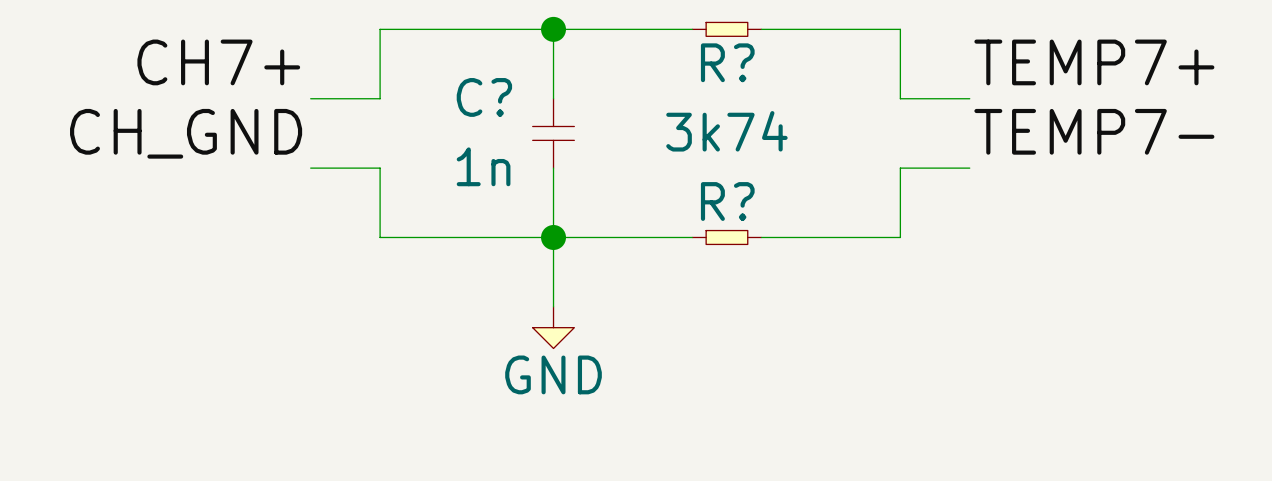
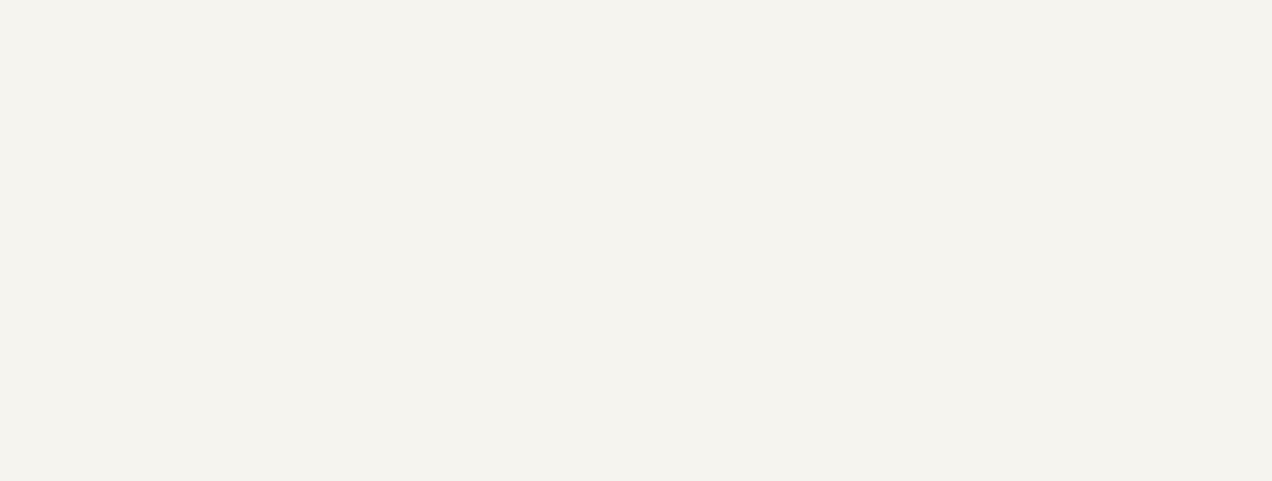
wire: (553, 29) (553, 98) -> none
junction: (553, 29) -> none
wire: (692, 29) (380, 29) (380, 98) (310, 98) -> none
R?: 3k74 (726, 29) -> none
wire: (761, 29) (900, 29) (900, 98) (969, 98) -> none
label: CH7+ (218, 62) -> none
label: TEMP7+ (1094, 62) -> none
label: TEMP7- (1094, 131) -> none
label: CH_GND (186, 133) -> none
C?: 1n (553, 133) -> none
wire: (310, 168) (380, 168) (380, 237) (692, 237) -> none
wire: (553, 168) (553, 306) -> none
wire: (969, 168) (900, 168) (900, 237) (761, 237) -> none
junction: (553, 237) -> none
R?: (726, 237) -> none
power symbol: GND (553, 327) -> none

